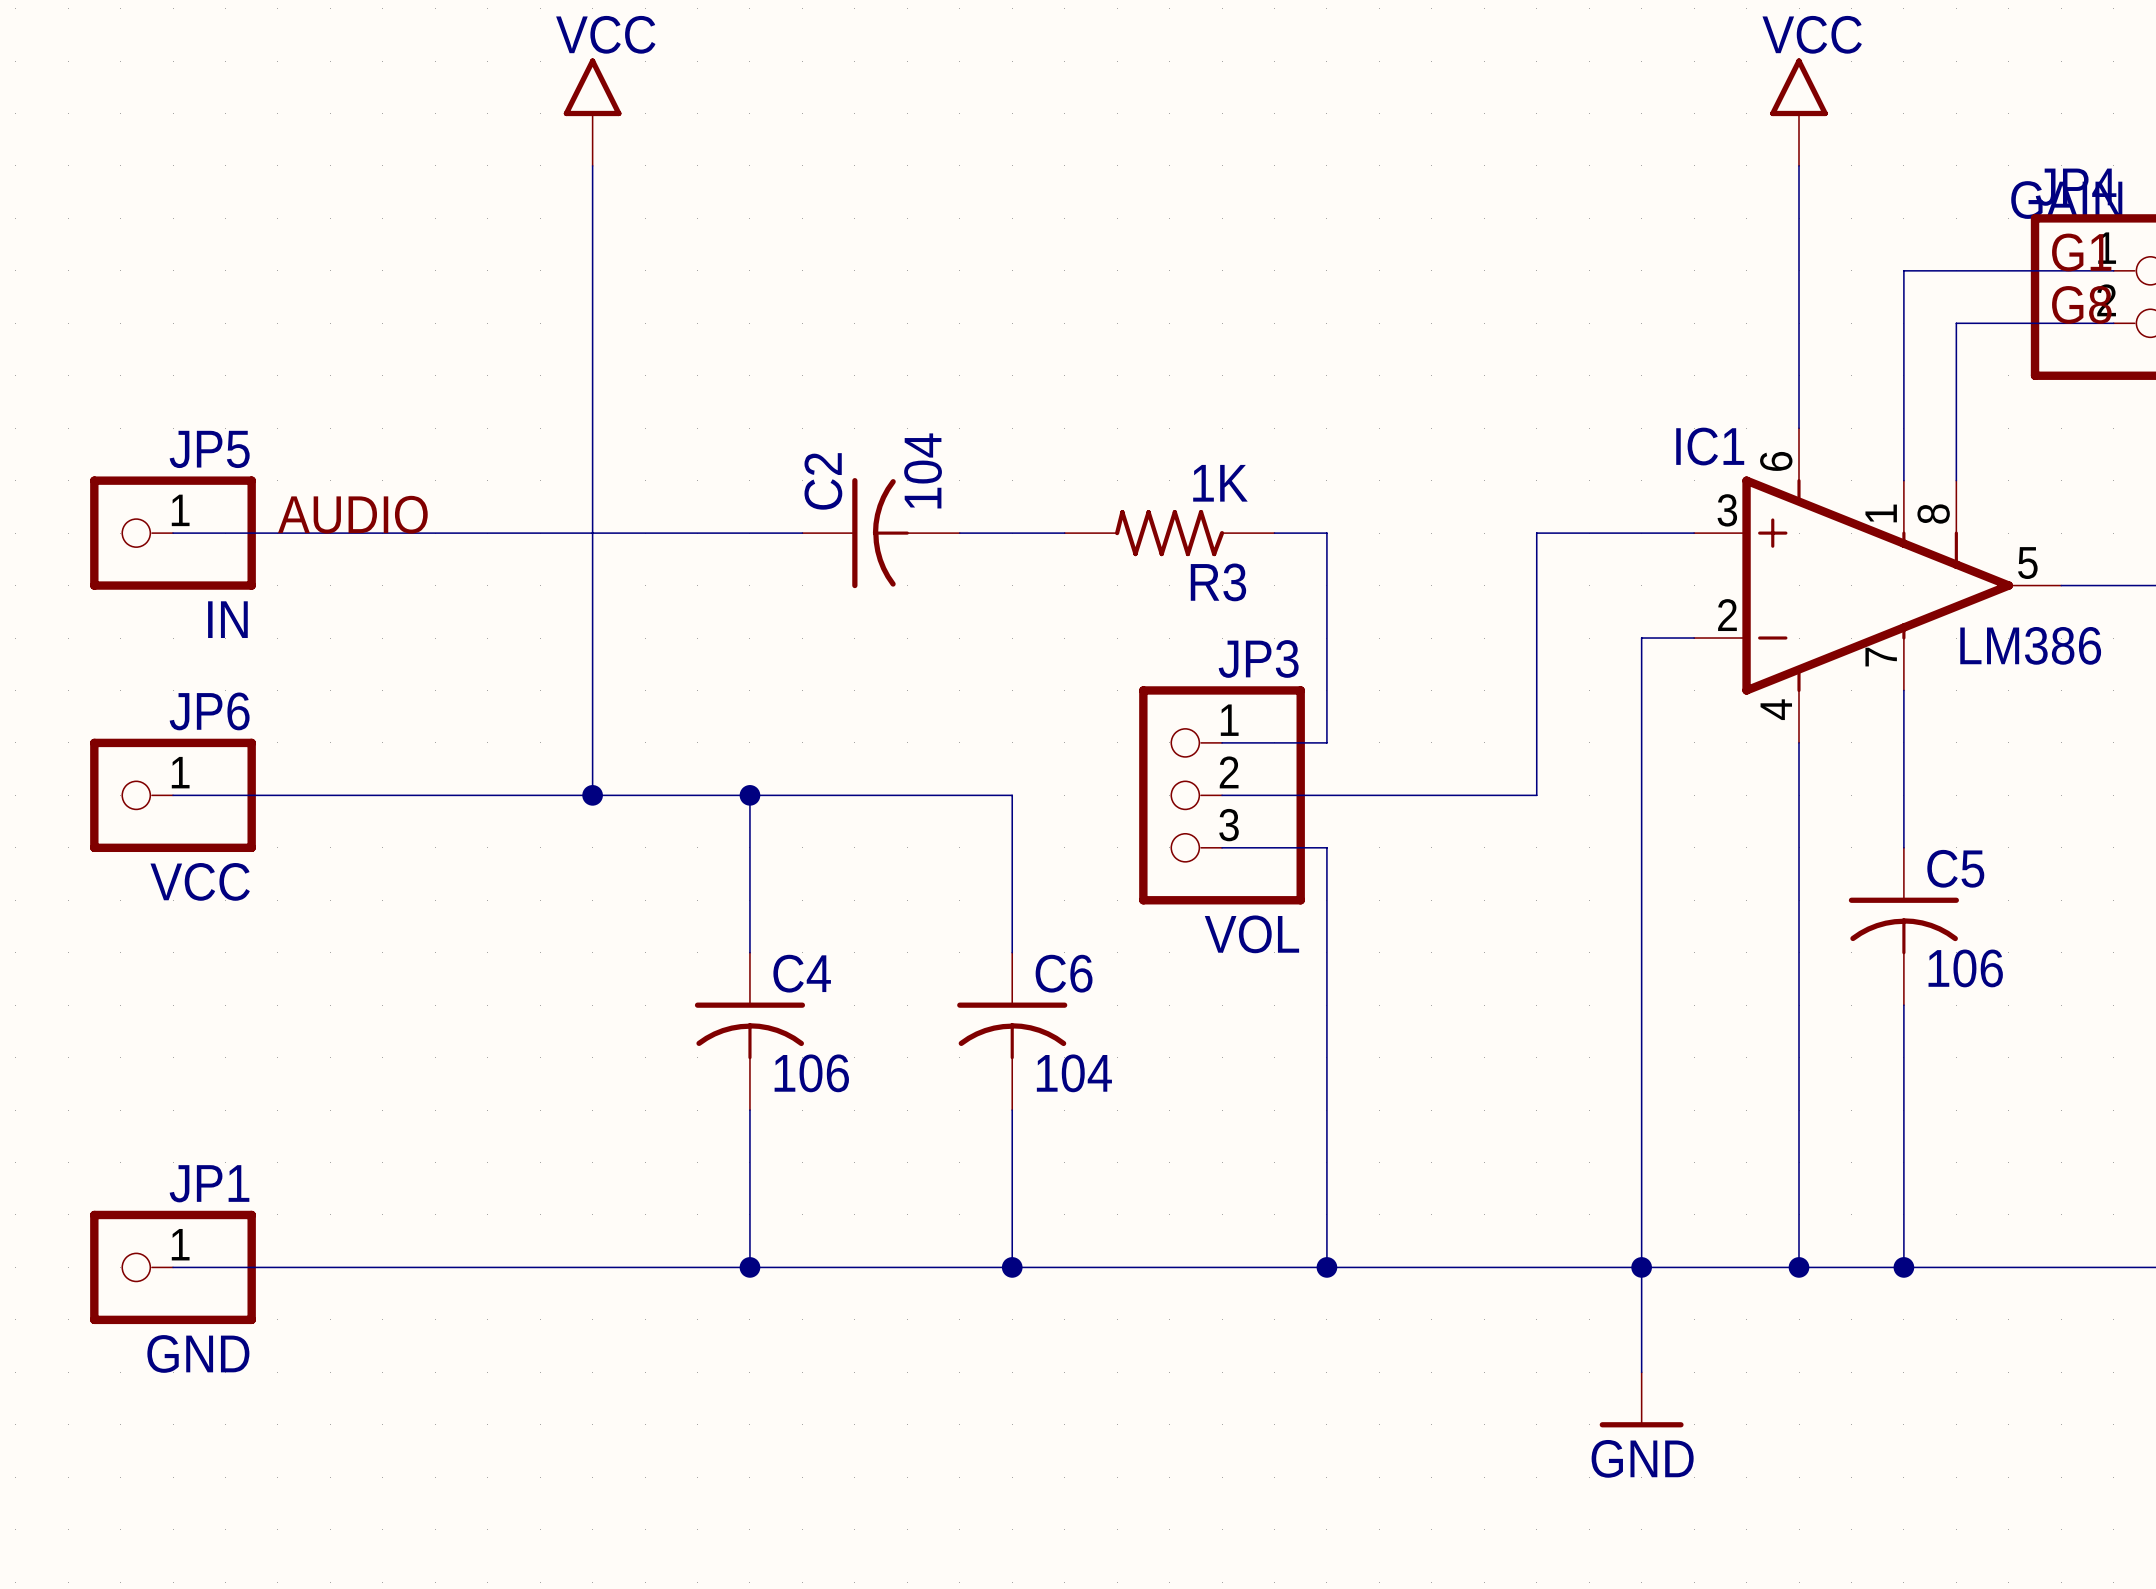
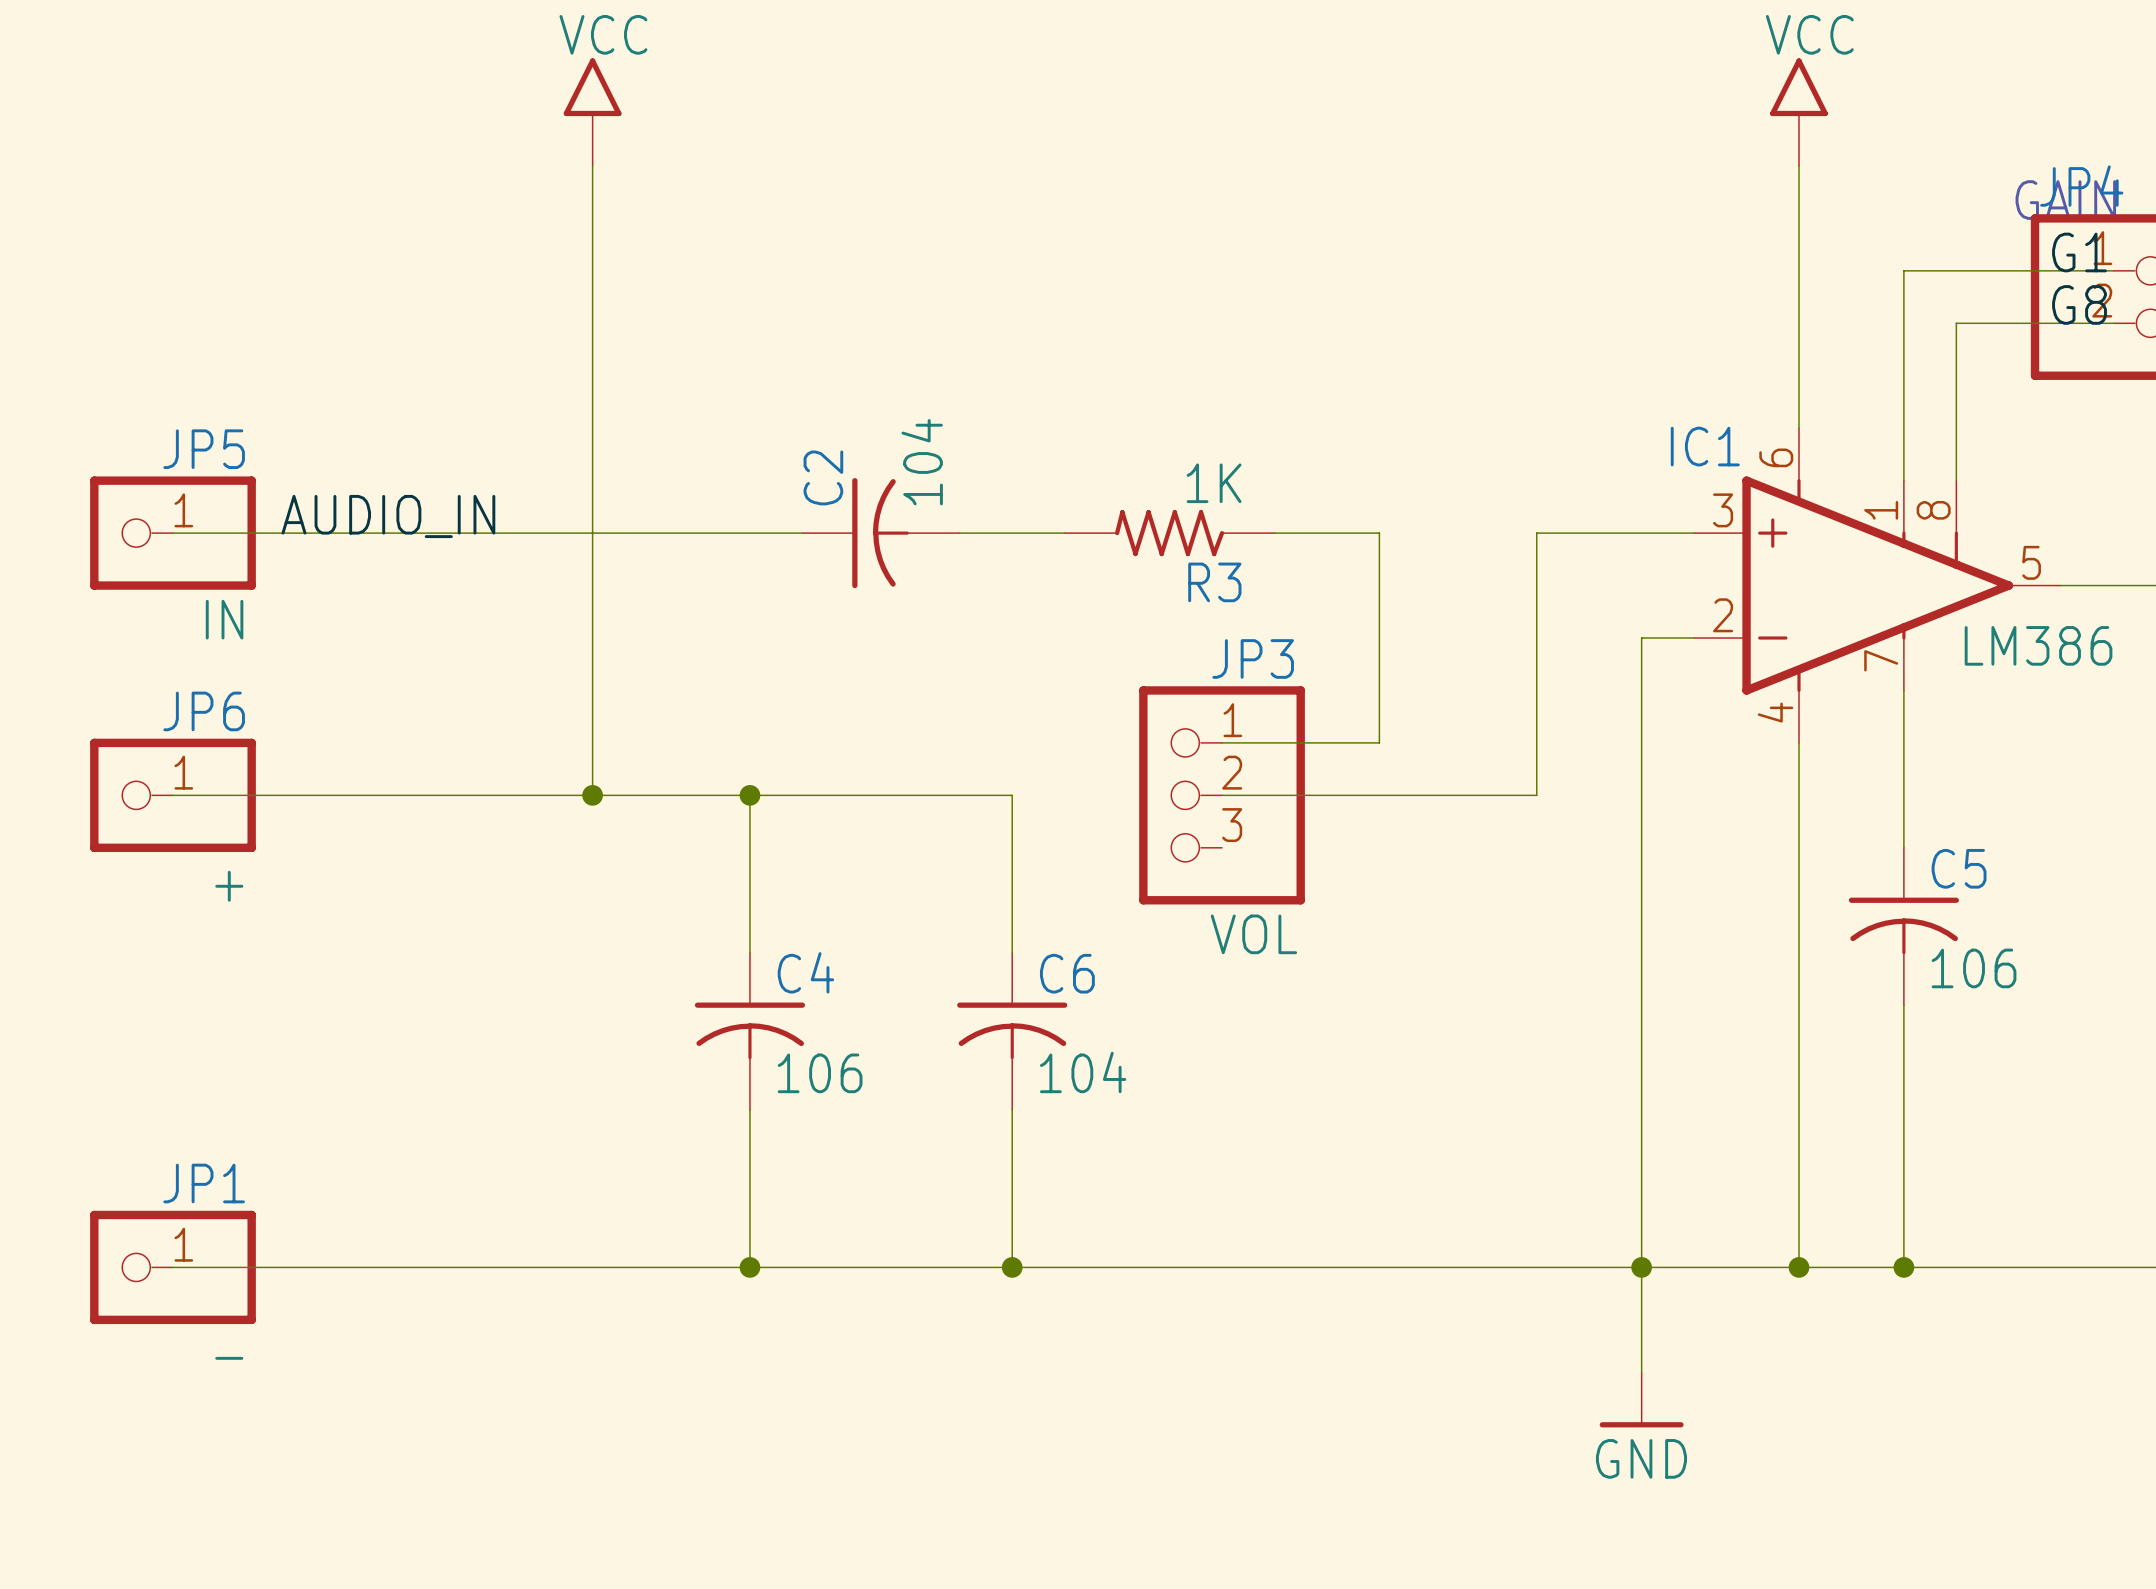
label: AUDIO (352, 514) -> AUDIO_IN (388, 516)
wire: (1326, 533) (1326, 742) -> (1326, 533) (1379, 533) (1379, 742) (1326, 742)
wire: (1222, 847) (1326, 847) (1326, 1267) -> none
JP6 value: VCC (200, 881) -> + (229, 886)
junction: (1326, 1267) -> none
JP1 value: GND (198, 1353) -> - (229, 1358)

